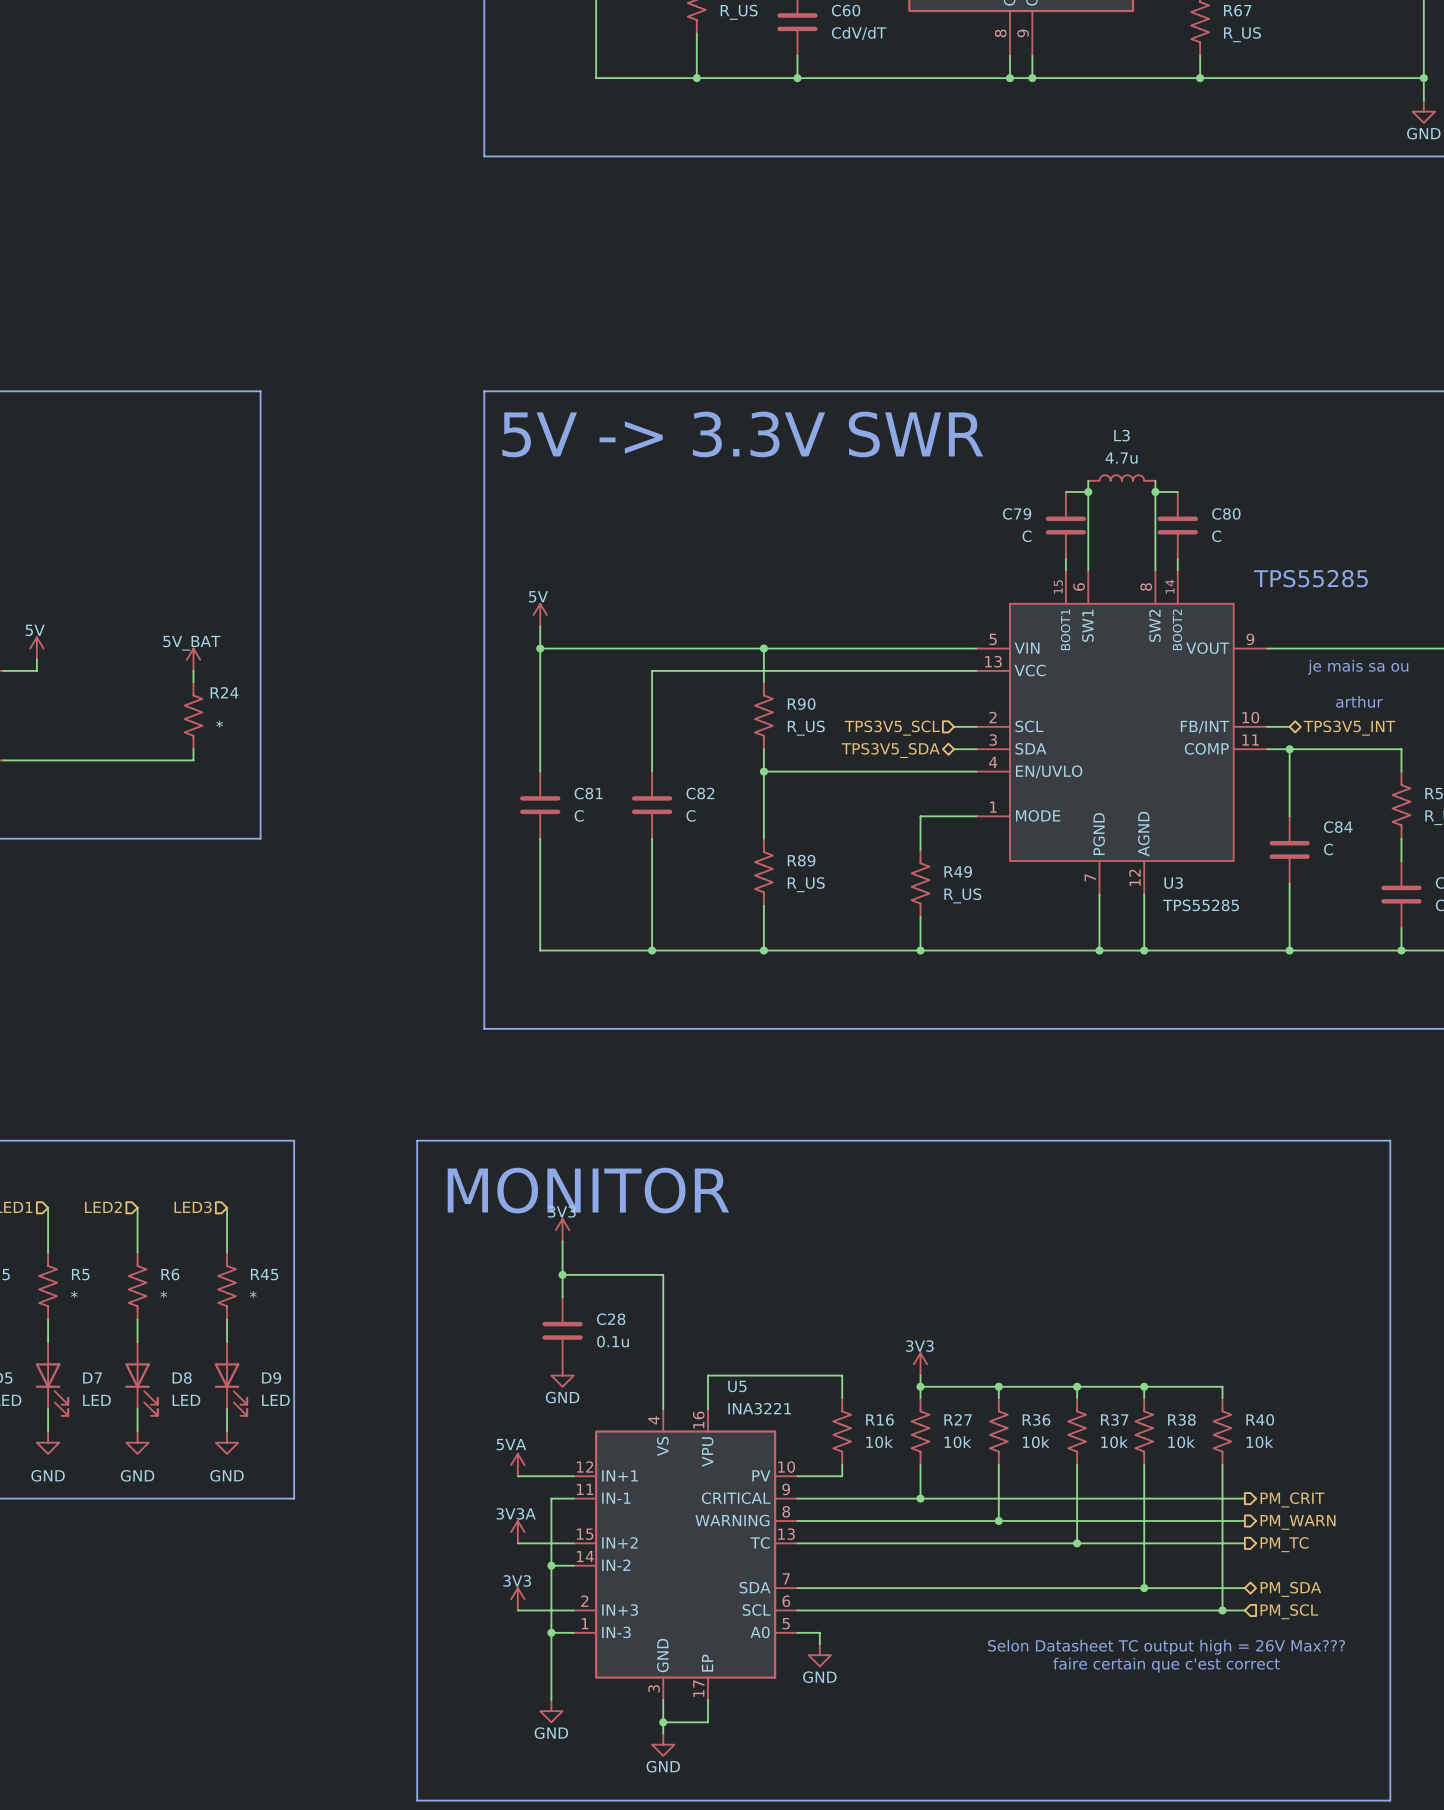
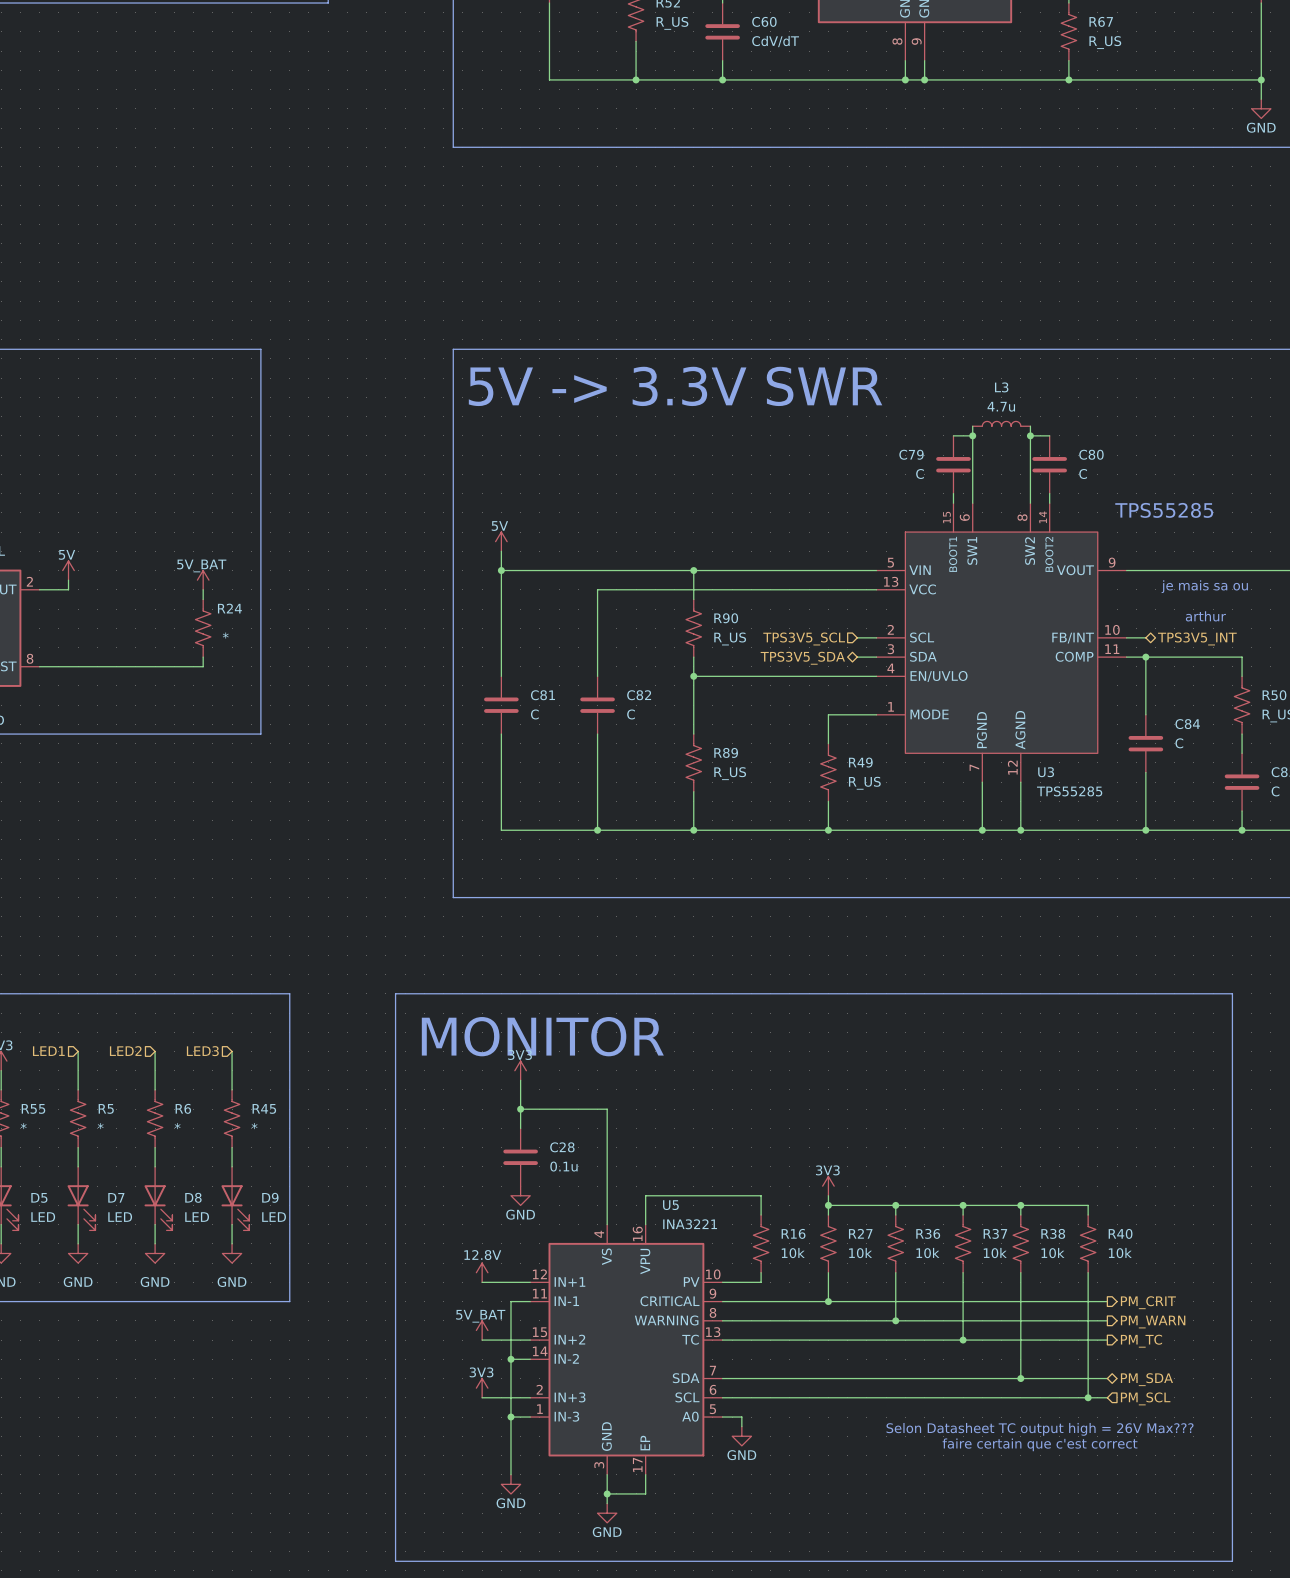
power symbol: 5VA (517, 1465) -> 12.8V (482, 1272)
power symbol: 3V3A (517, 1532) -> 5V_BAT (482, 1330)

